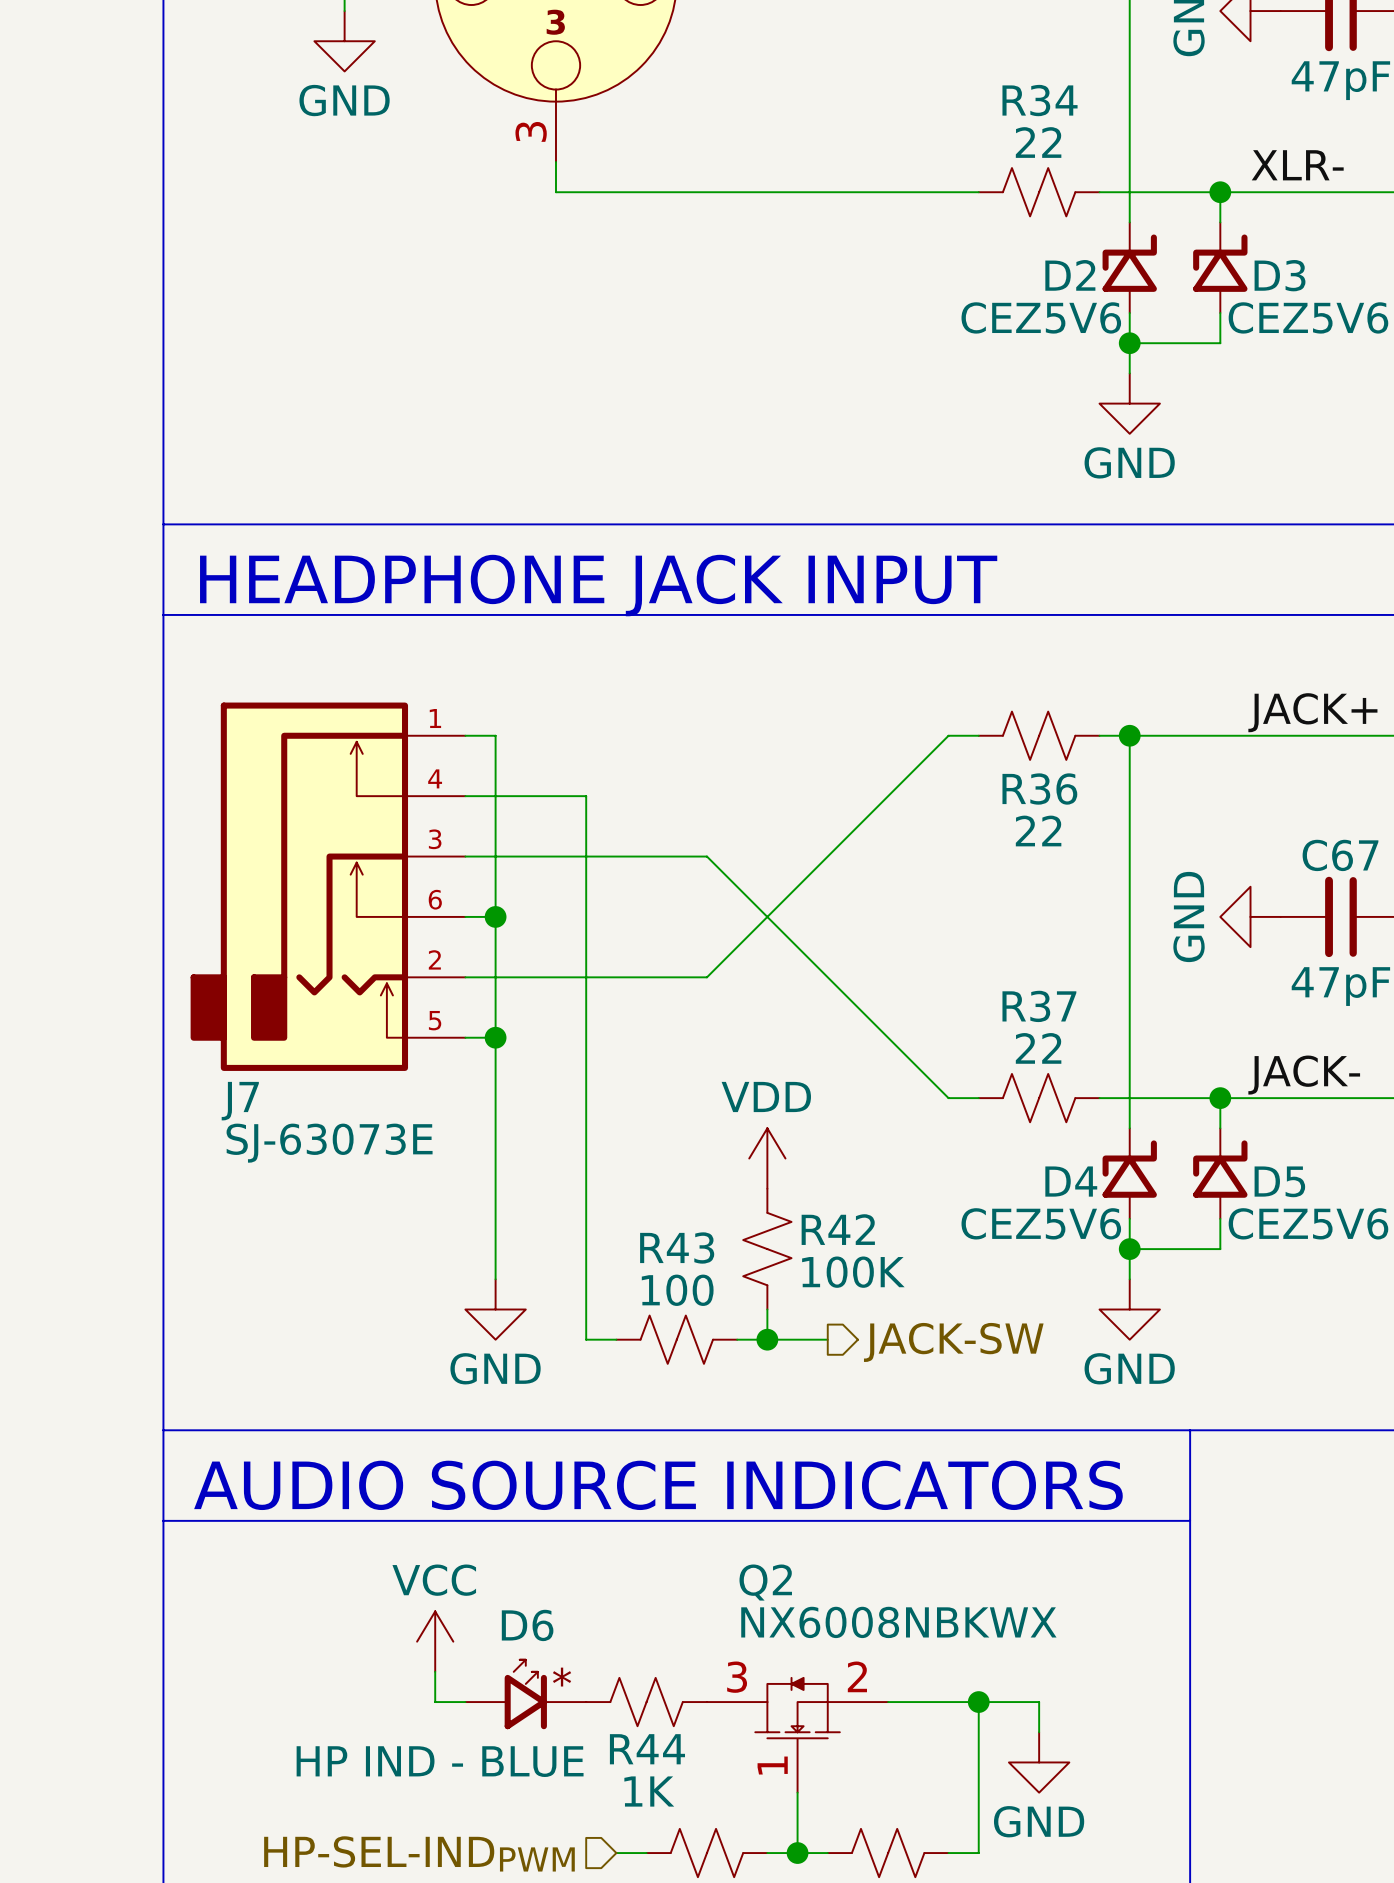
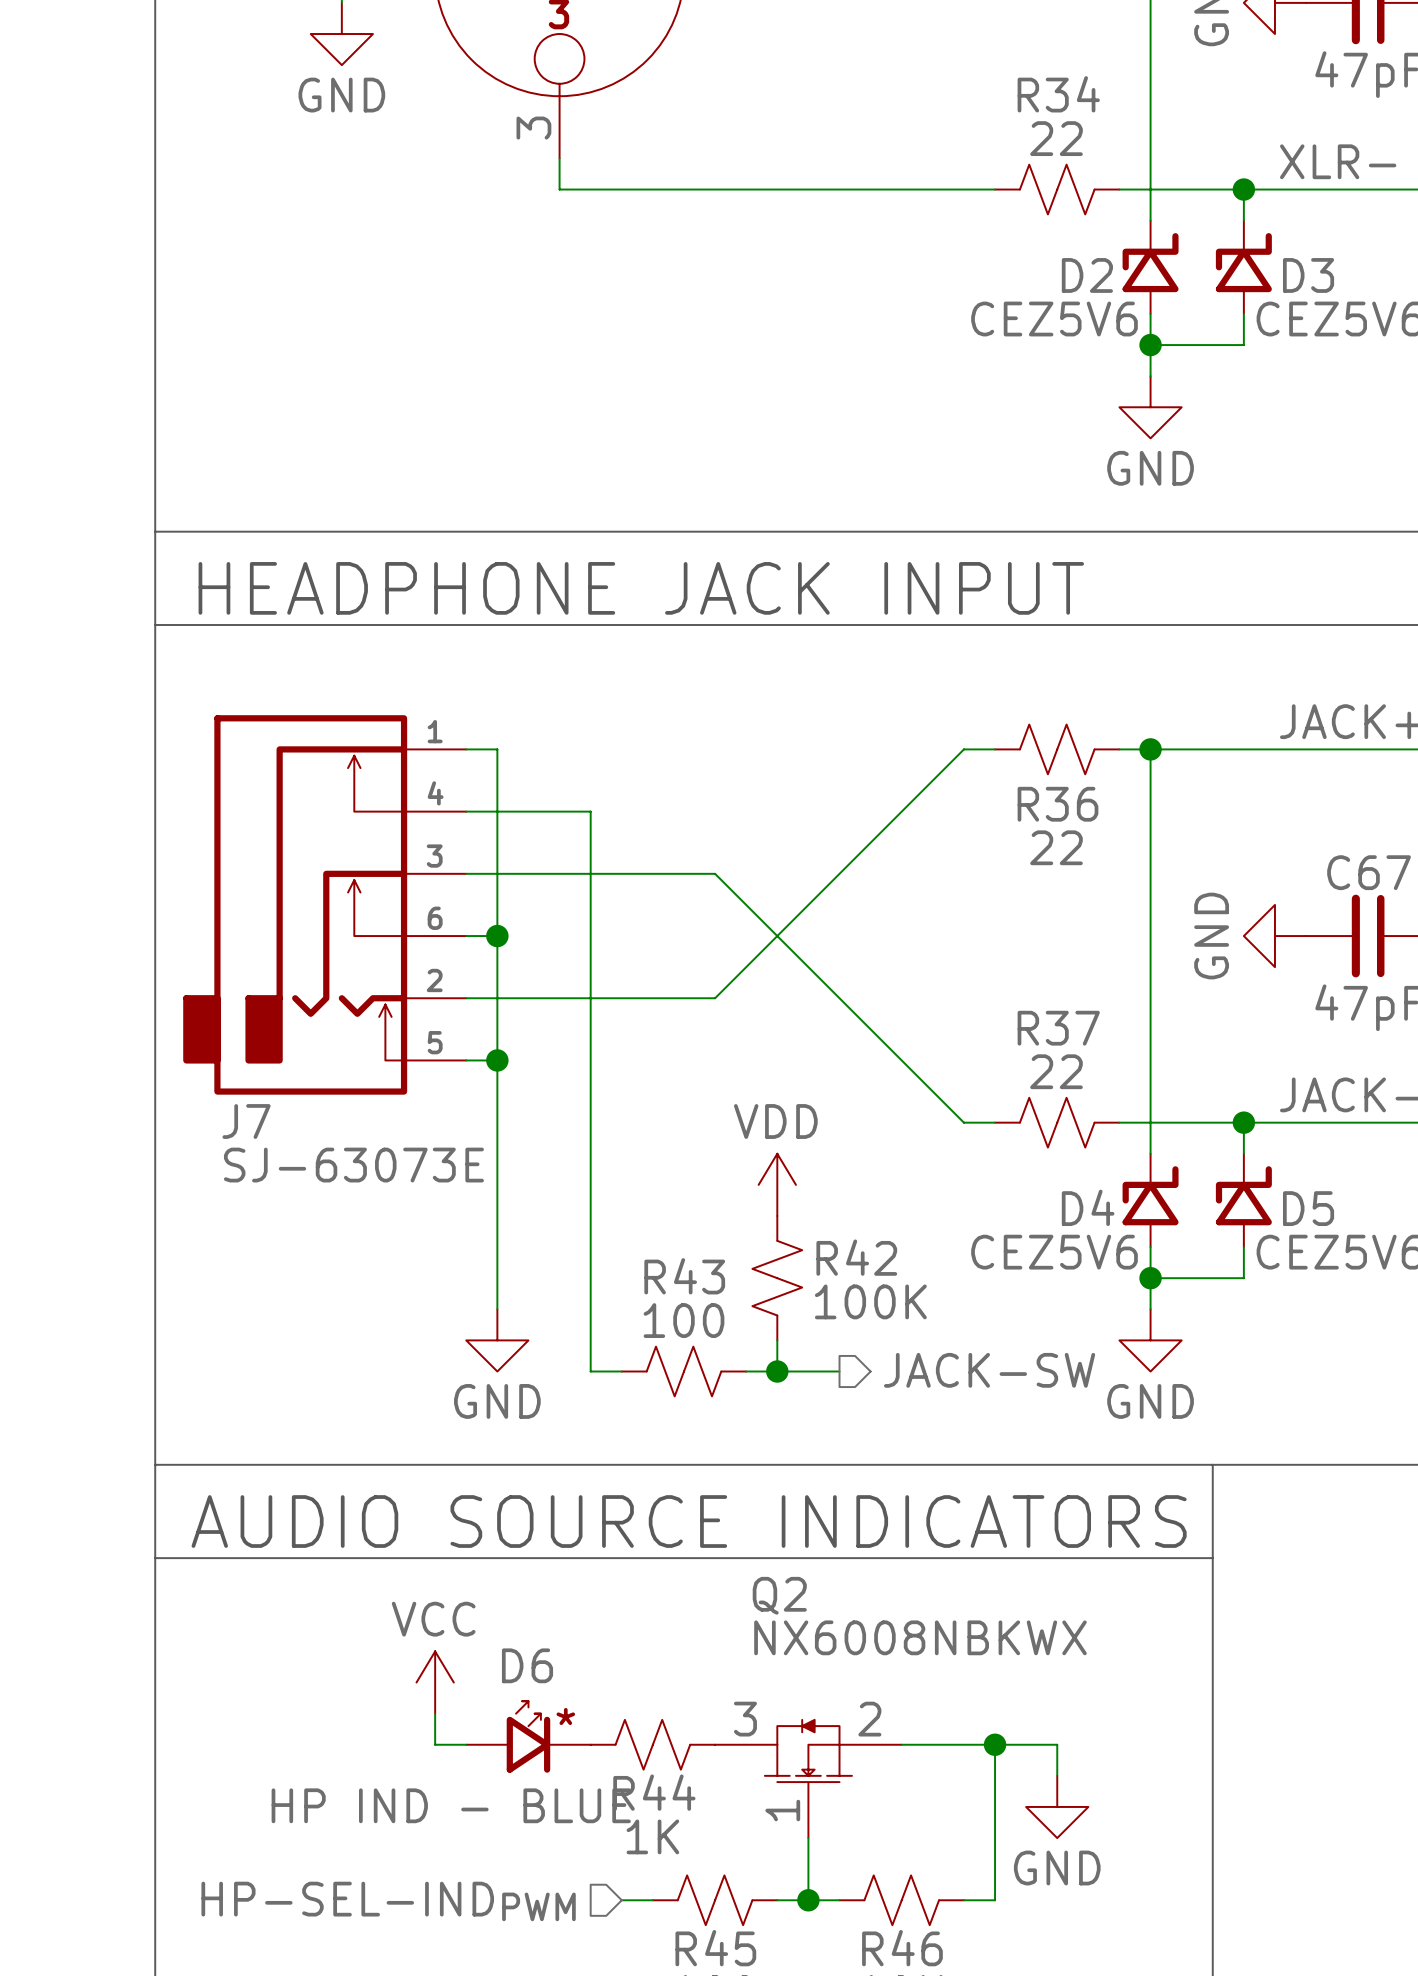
Q2 name position: Q2 (765, 1582) -> Q2 (779, 1595)
Q2 value position: NX6008NBKWX (898, 1622) -> NX6008NBKWX (920, 1637)
D6 value position: HP IND - BLUE (440, 1761) -> HP IND - BLUE (451, 1805)

